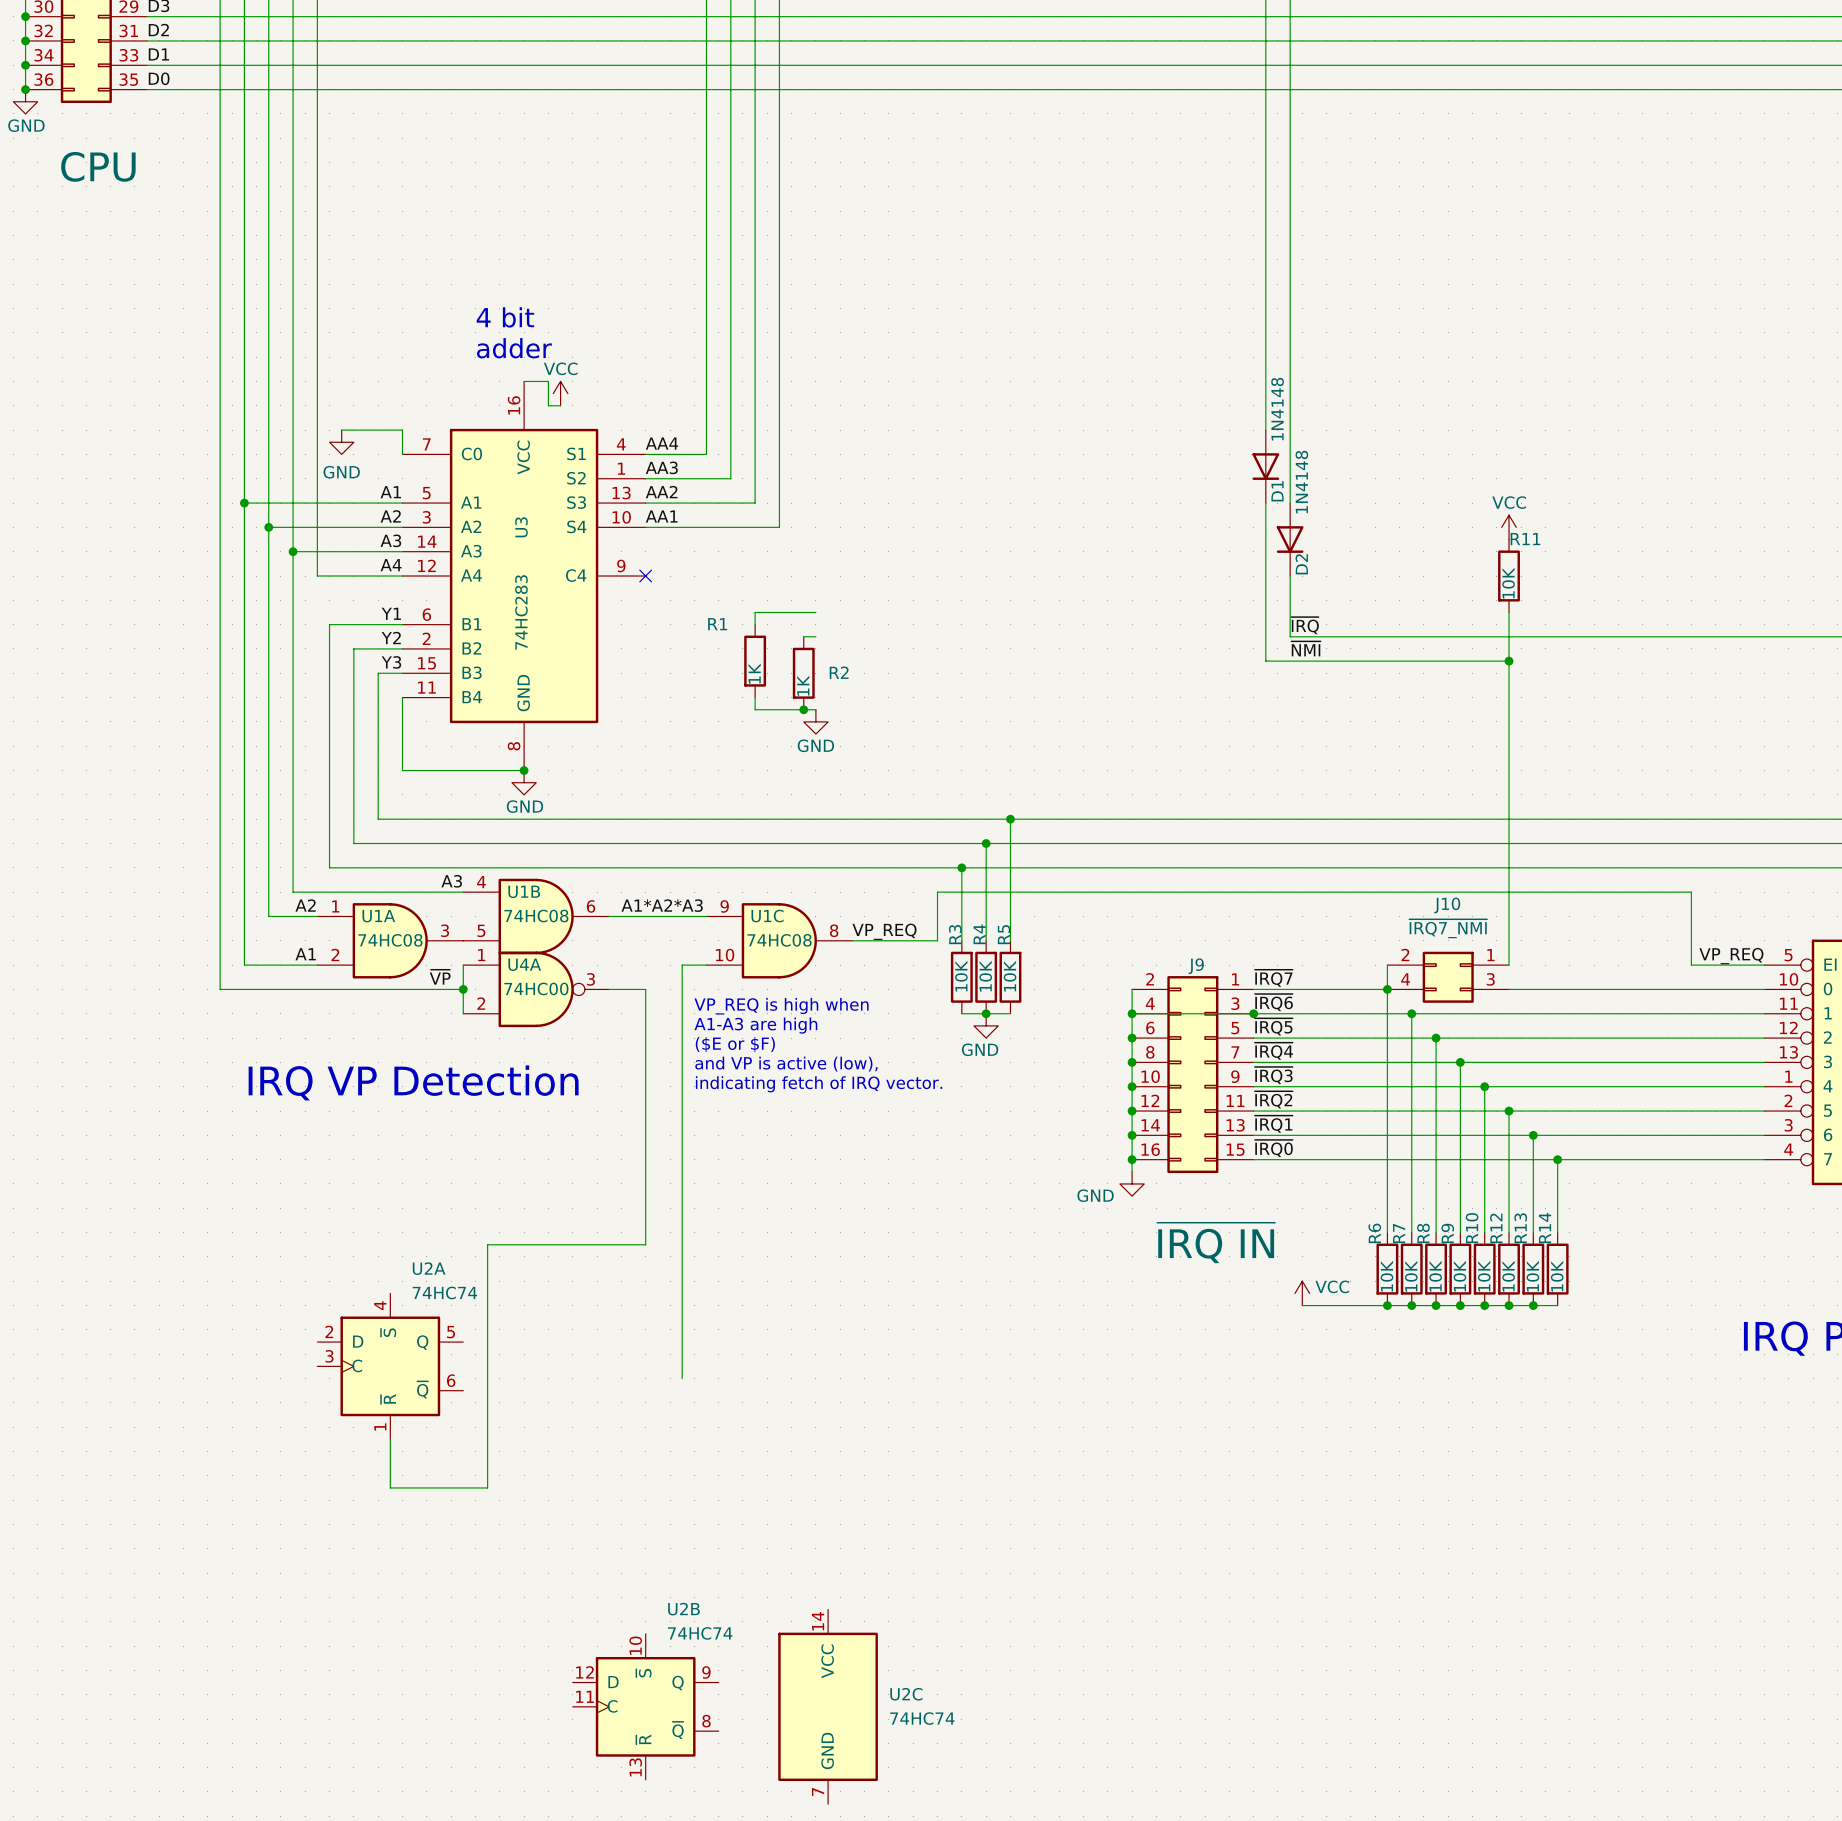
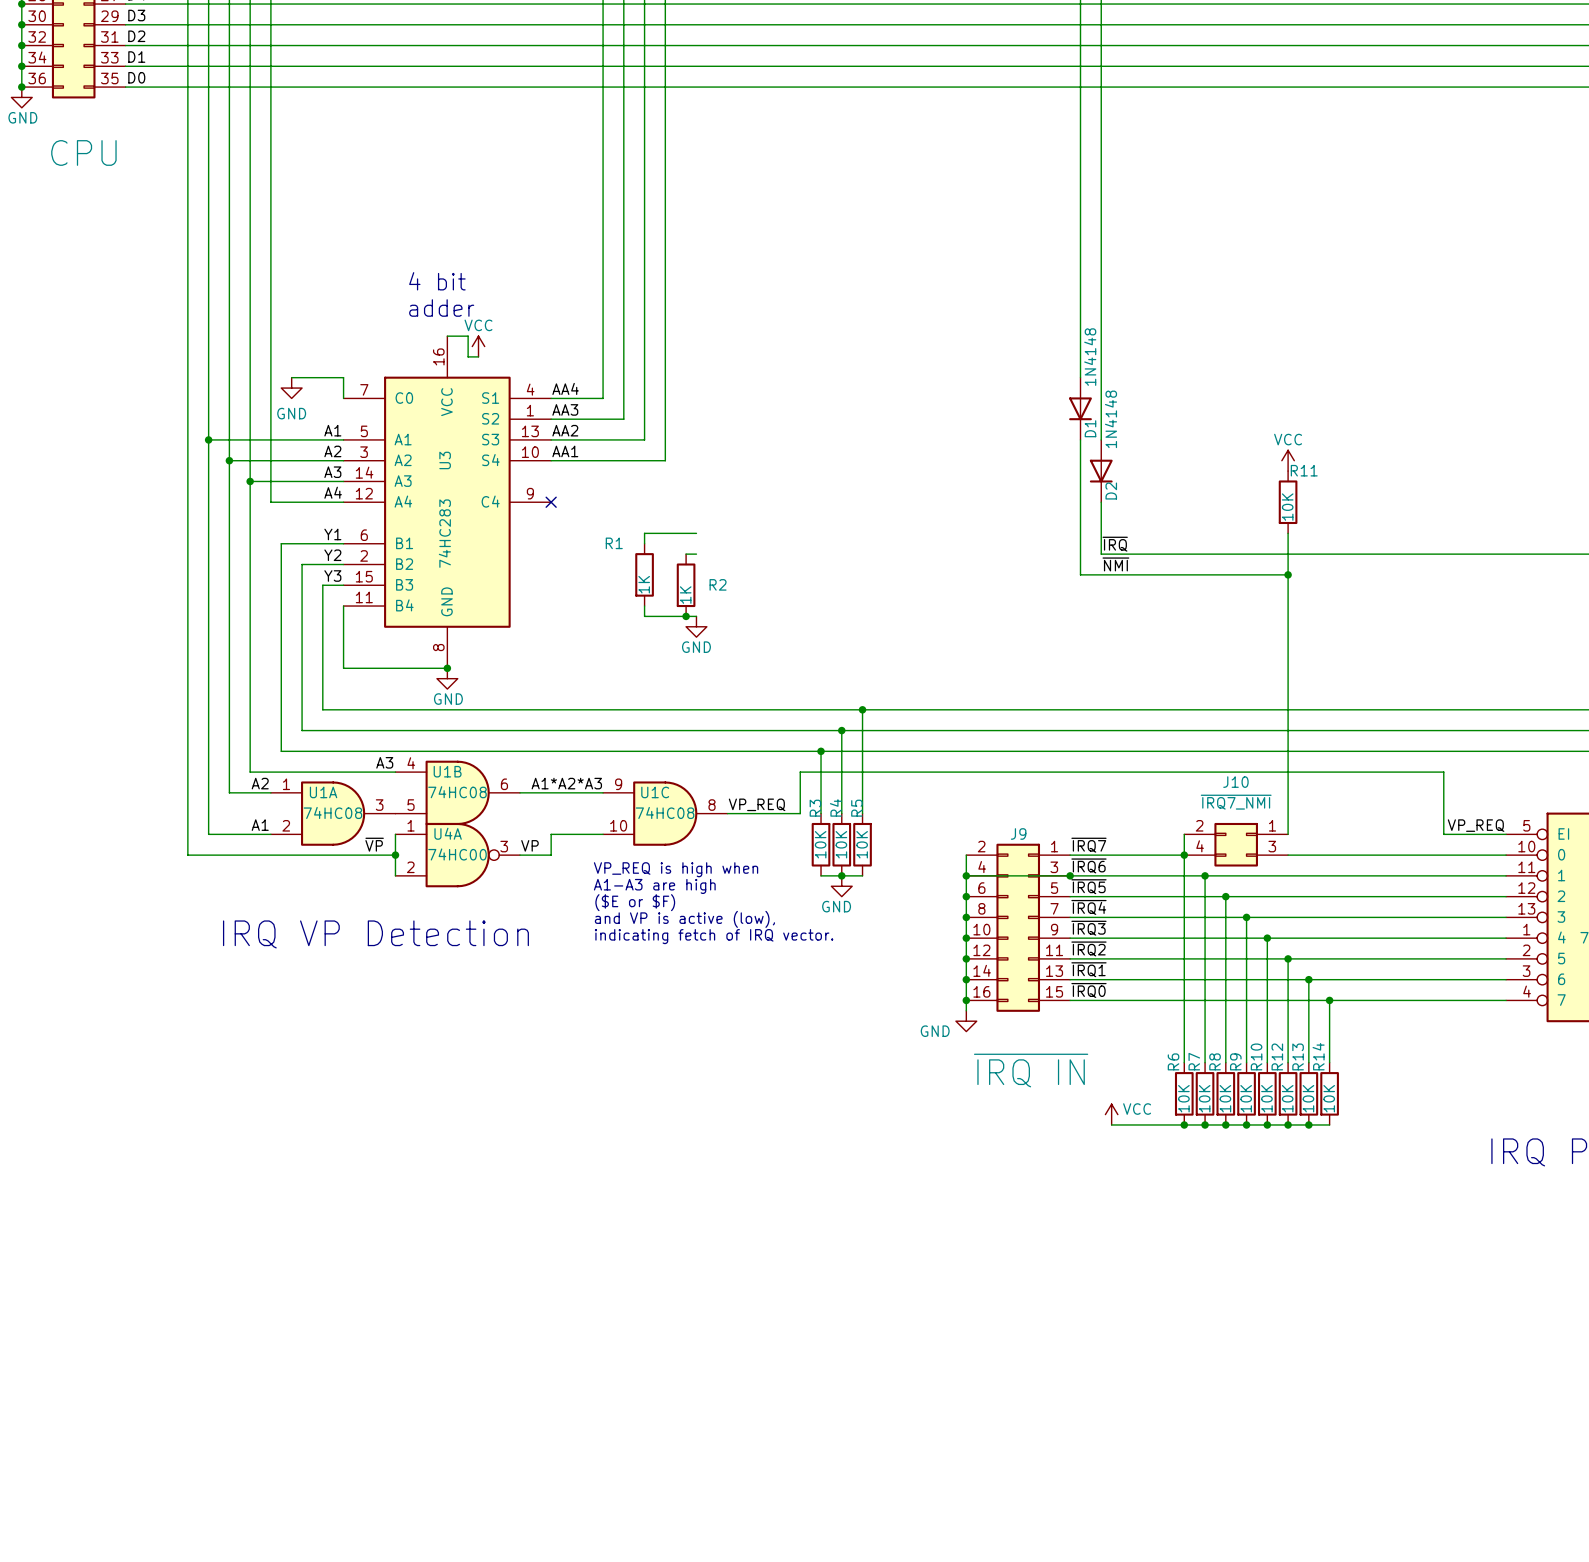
wire: (682, 965) (682, 1378) -> (582, 834) (551, 834) (551, 855)
label: none -> VP (529, 845)
wire: (645, 989) (645, 1244) (487, 1244) (487, 1487) (390, 1487) (390, 1439) -> none
U2A: 74HC74 (390, 1366) -> none
U2B: 74HC74 (645, 1706) -> none
U2C: 74HC74 (828, 1706) -> none

